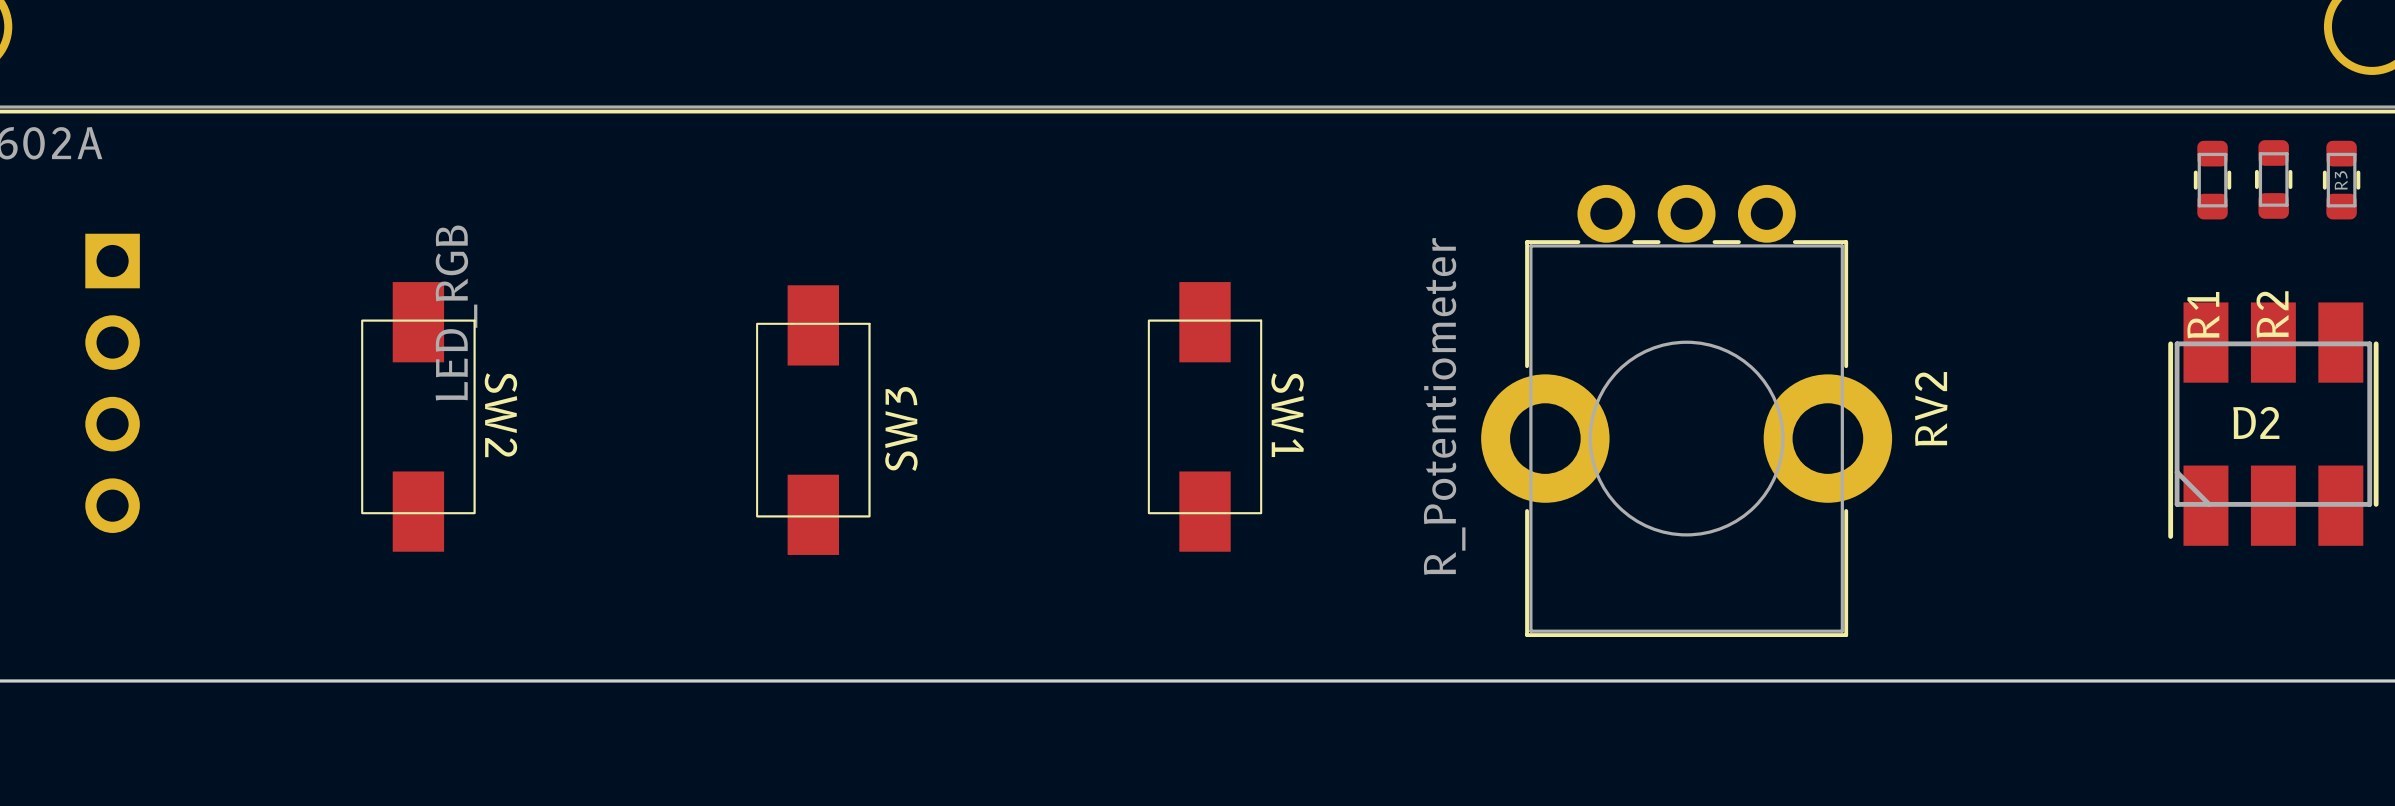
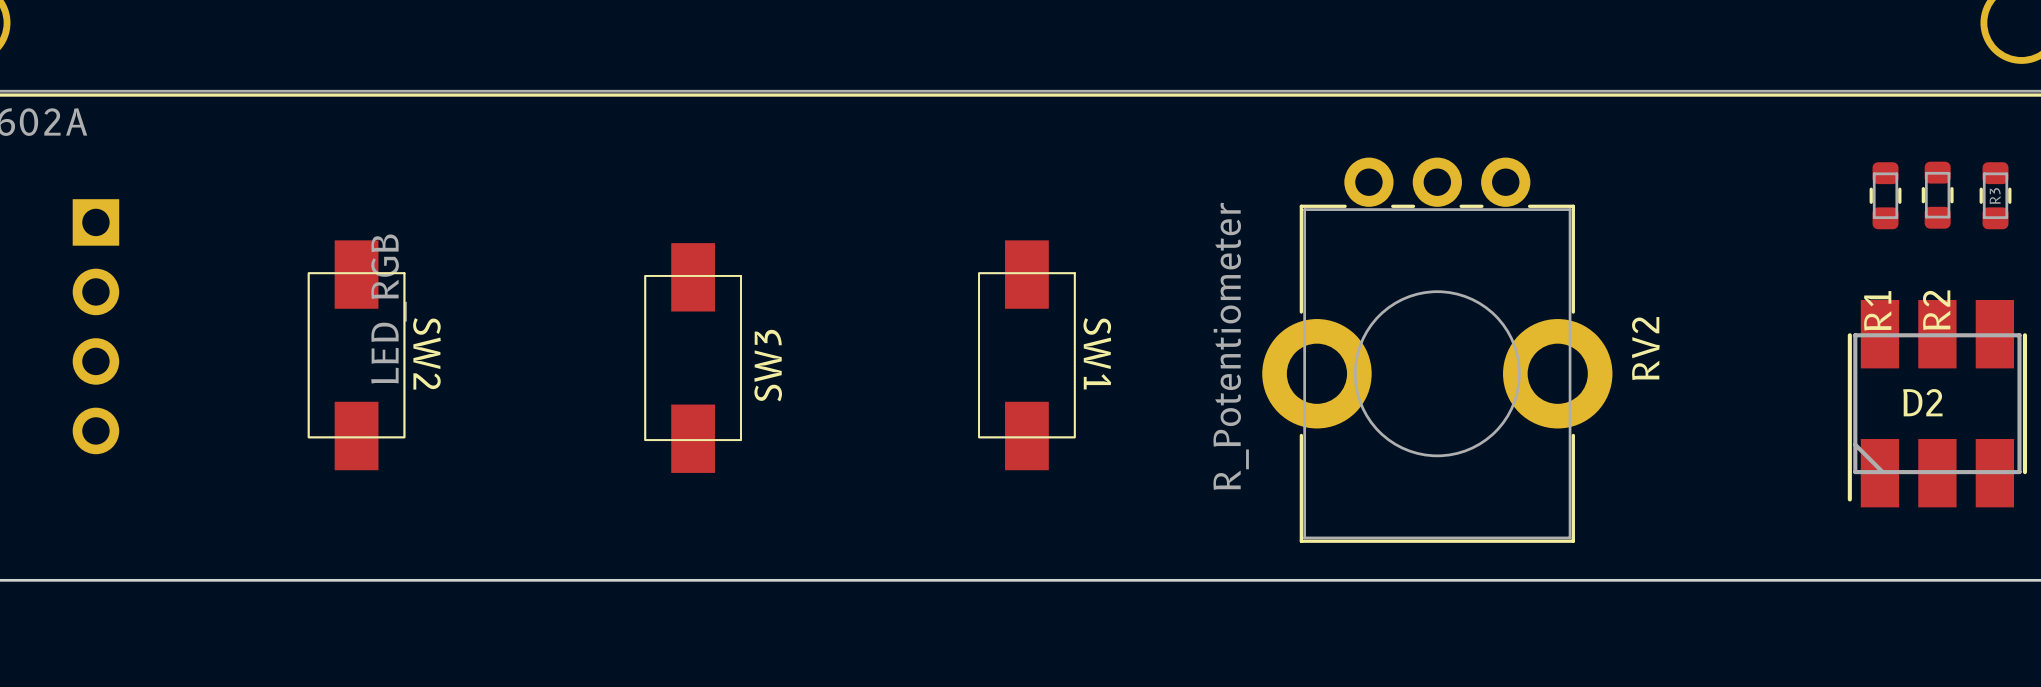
R2 position: (2273, 179) -> (1937, 195)
R1 position: (2212, 180) -> (1885, 195)
R3 position: (2341, 180) -> (1995, 195)
D2 position: (2273, 424) -> (1937, 403)

